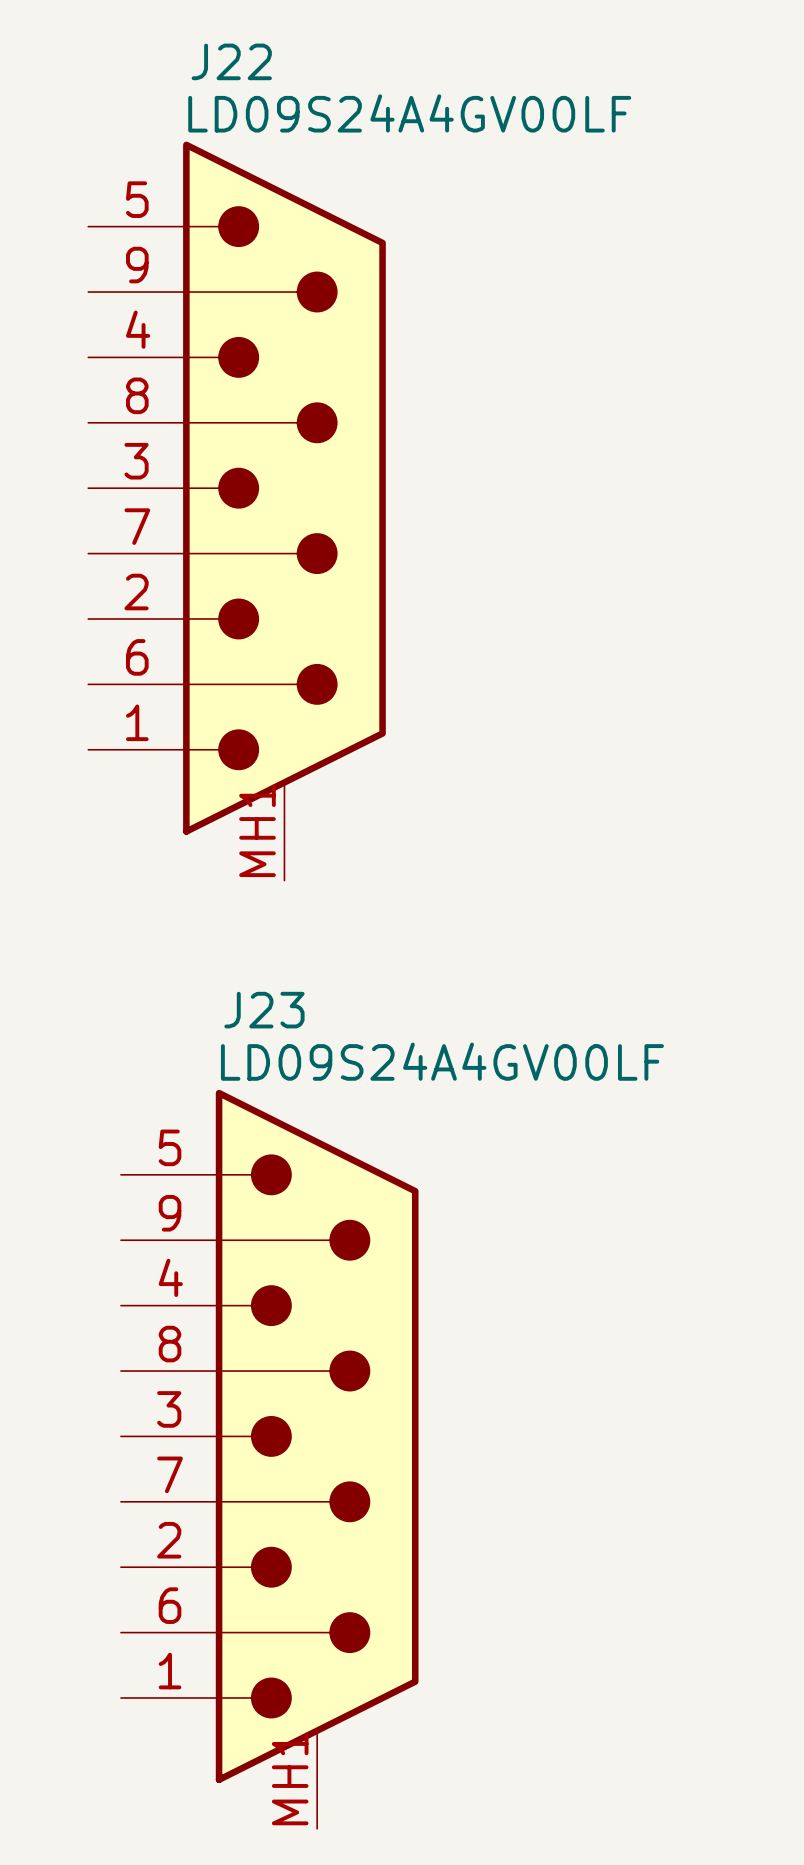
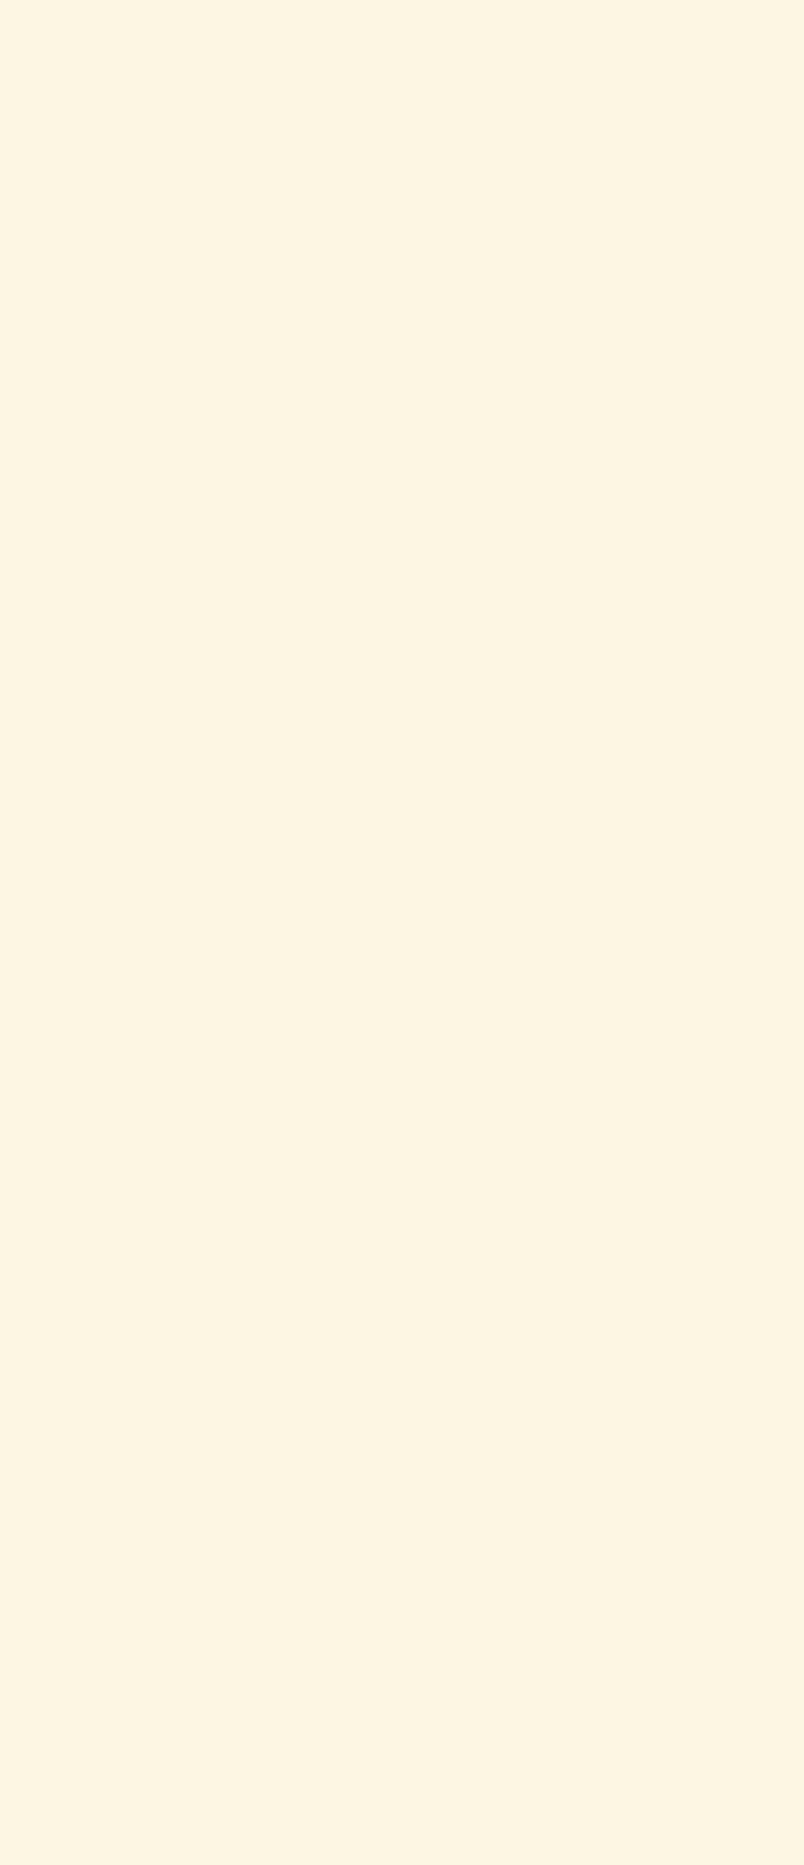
J22: LD09S24A4GV00LF (237, 511) -> none
J23: LD09S24A4GV00LF (269, 1459) -> none

